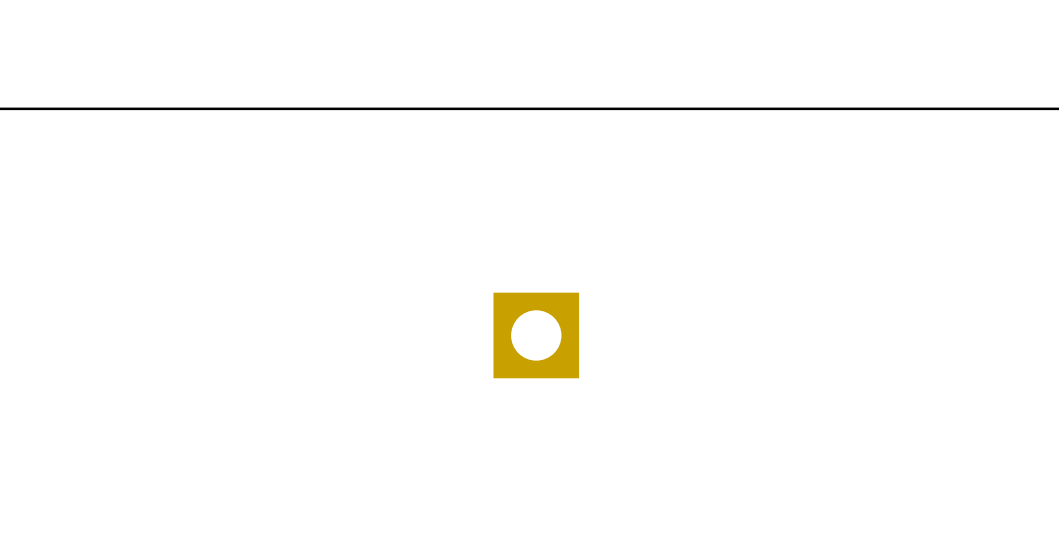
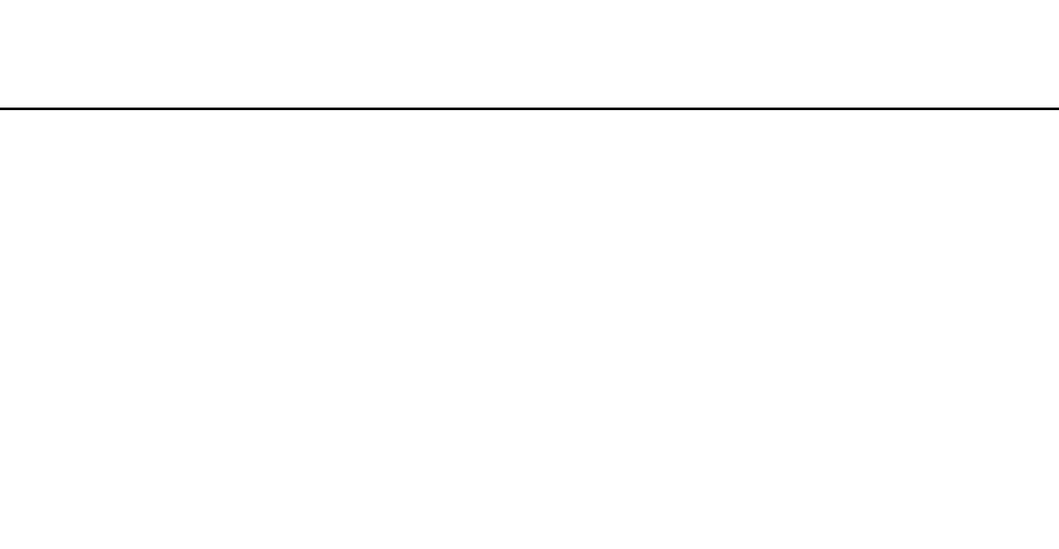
part: (536, 335) -> none

